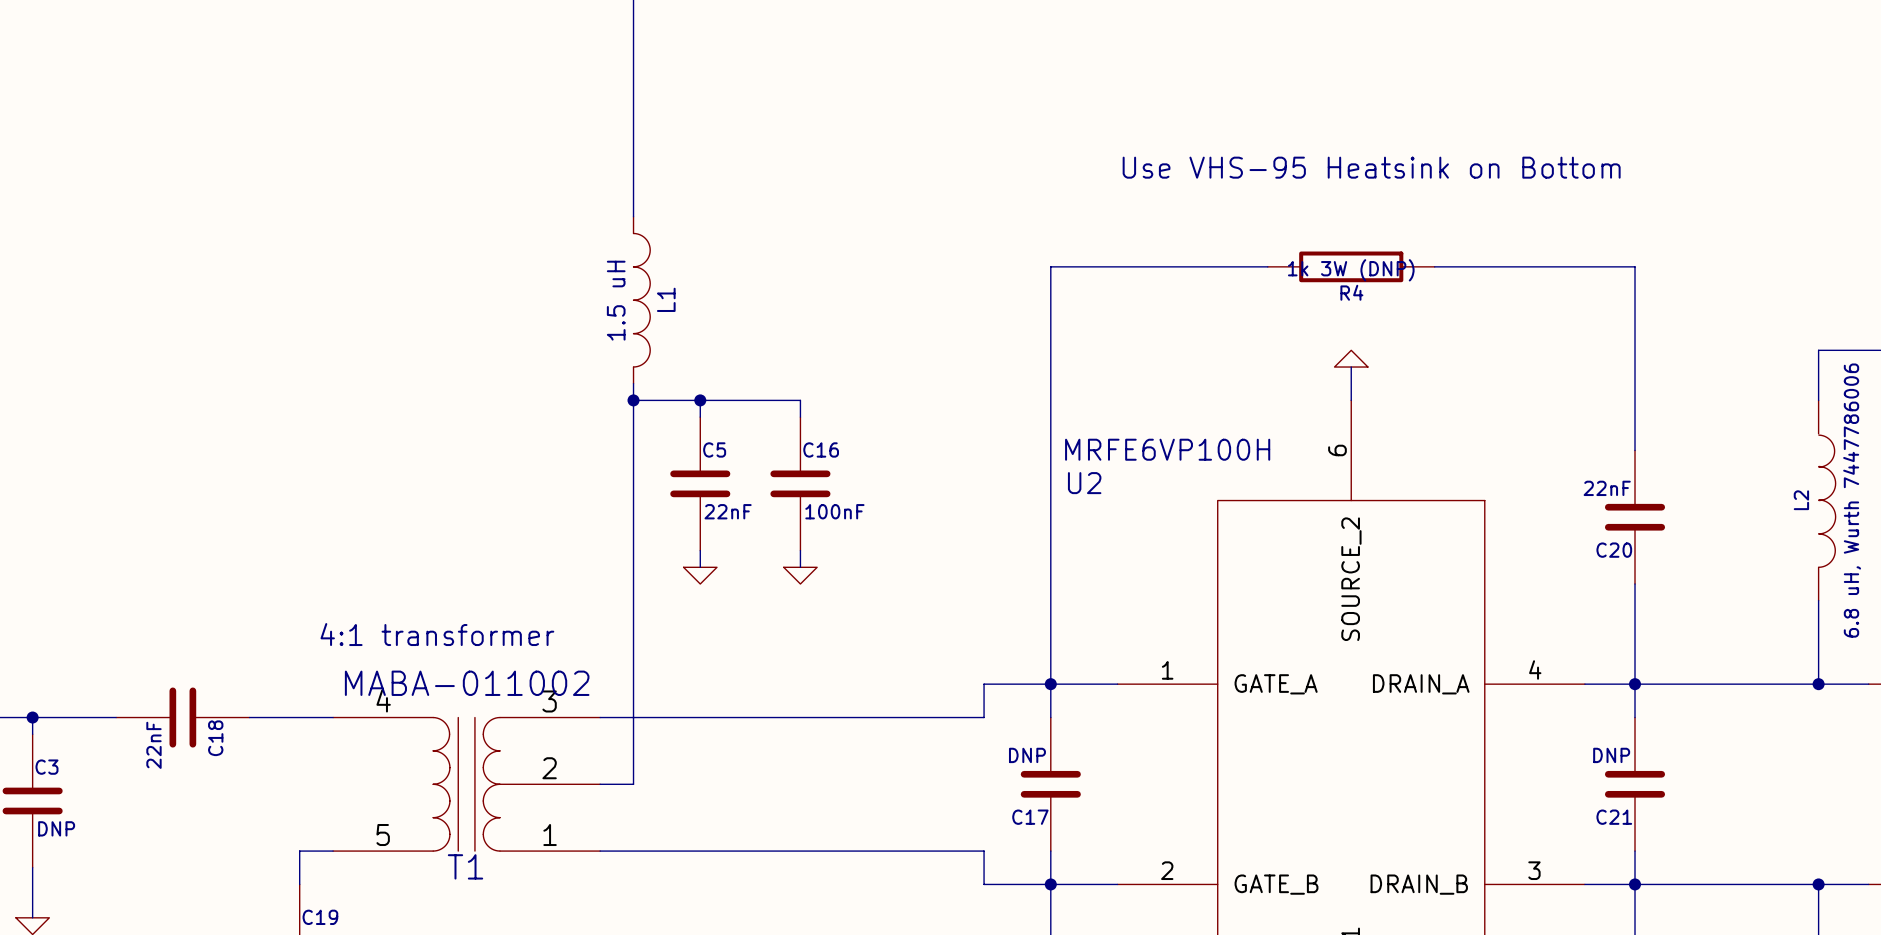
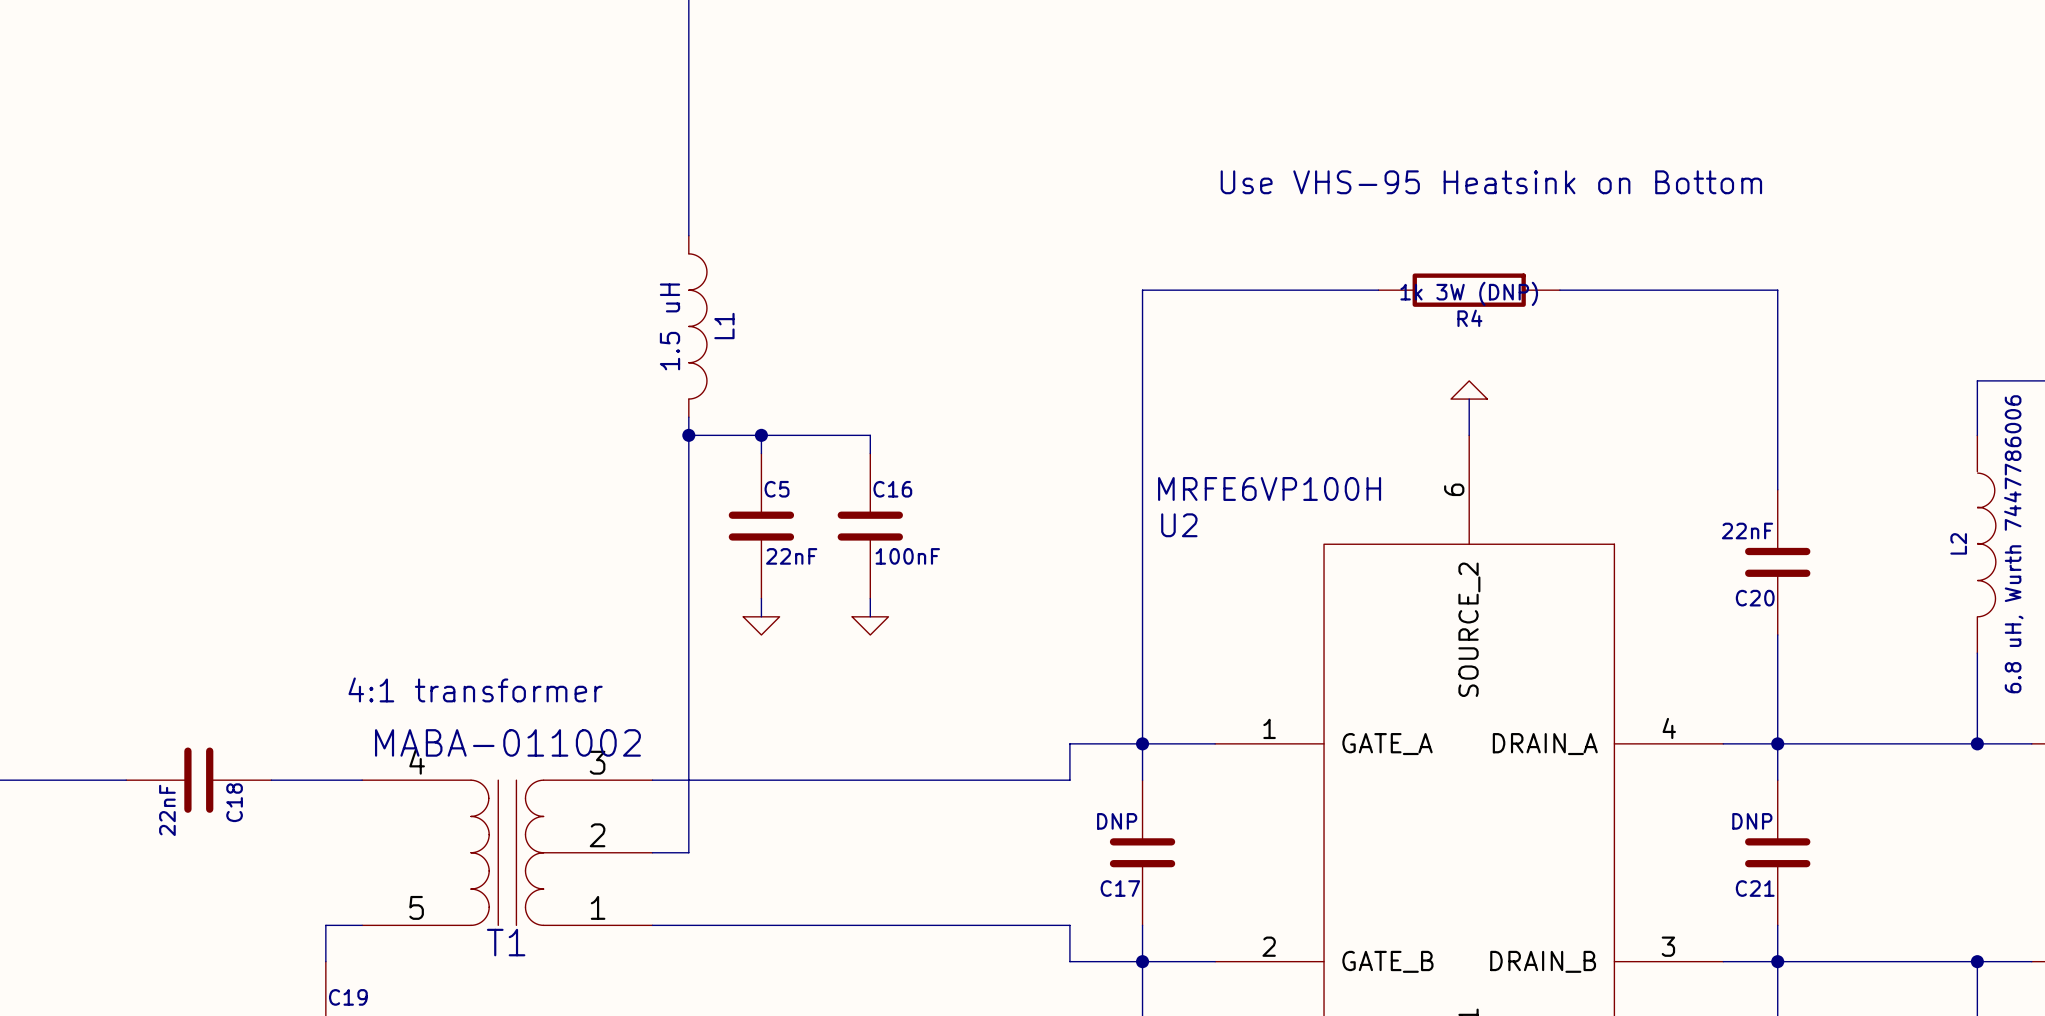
wire: (32, 717) (32, 734) -> none
junction: (32, 717) -> none
C3: DNP (32, 800) -> none
wire: (32, 867) (32, 917) -> none
power symbol: (32, 926) -> none

